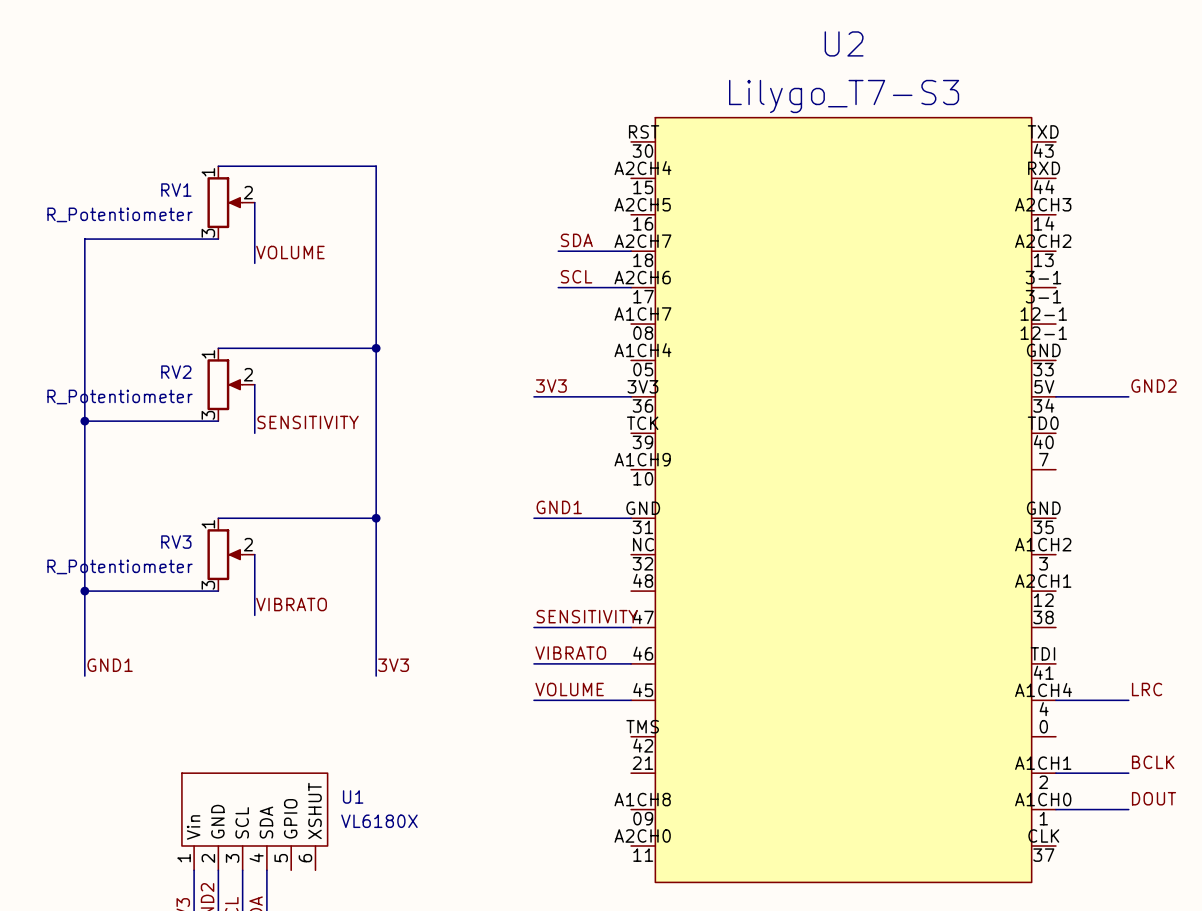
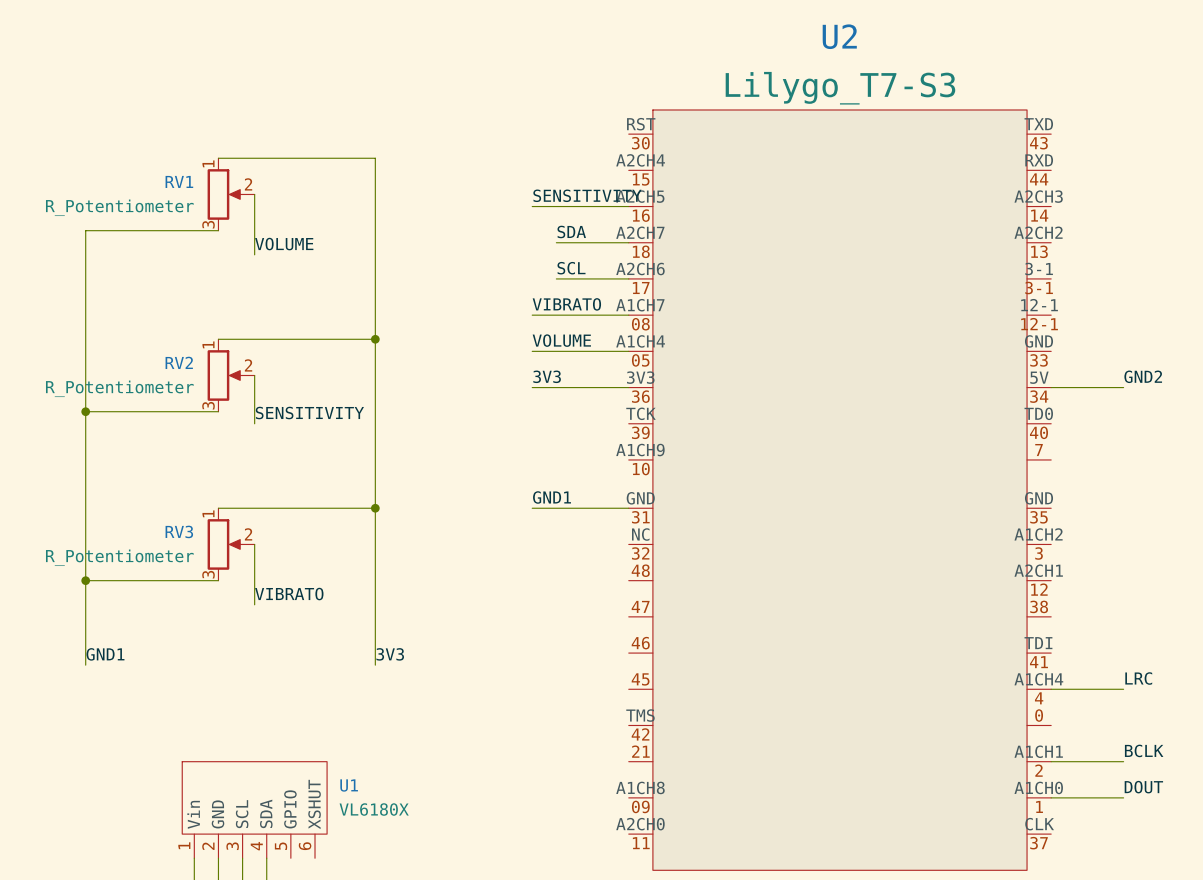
label: none -> SENSITIVITY (587, 195)
wire: none -> (532, 206) (628, 206)
label: none -> VIBRATO (566, 304)
wire: none -> (532, 315) (628, 315)
label: none -> VOLUME (561, 340)
wire: none -> (532, 351) (628, 351)
label: SENSITIVITY (587, 616) -> none
wire: (533, 627) (631, 627) -> none
label: VIBRATO (570, 653) -> none
wire: (533, 663) (631, 663) -> none
label: VOLUME (569, 689) -> none
wire: (533, 700) (631, 700) -> none

